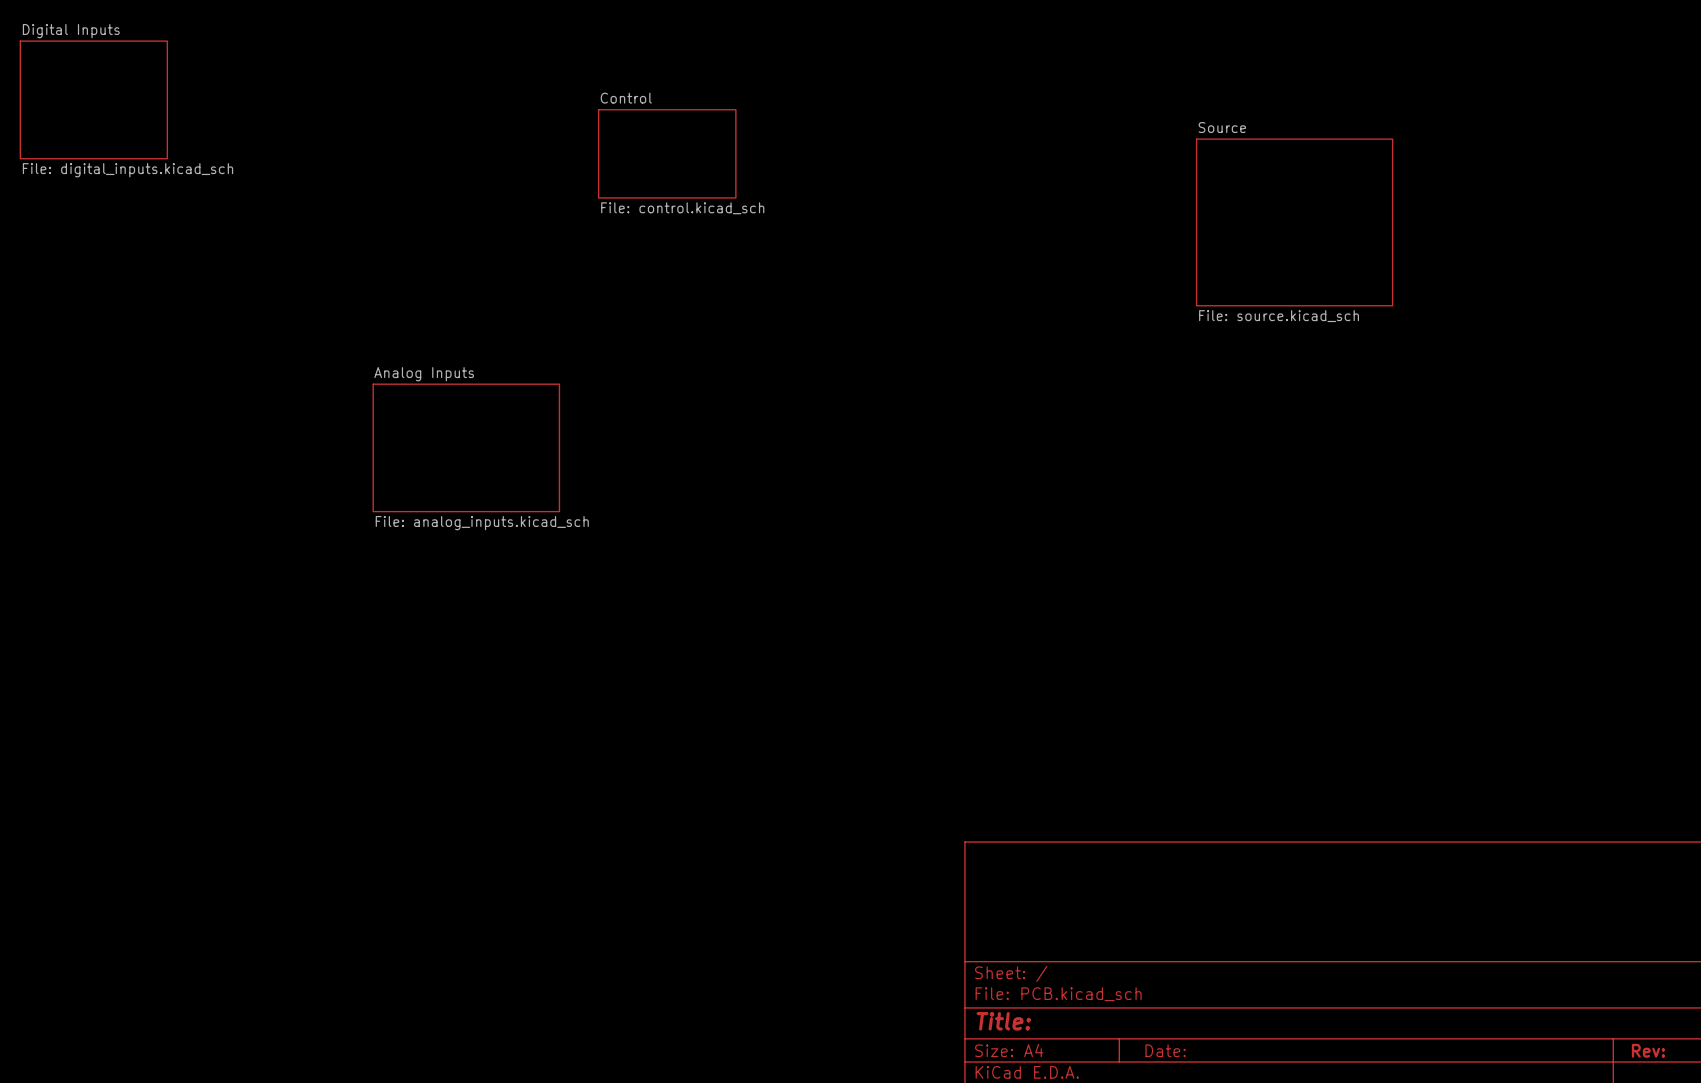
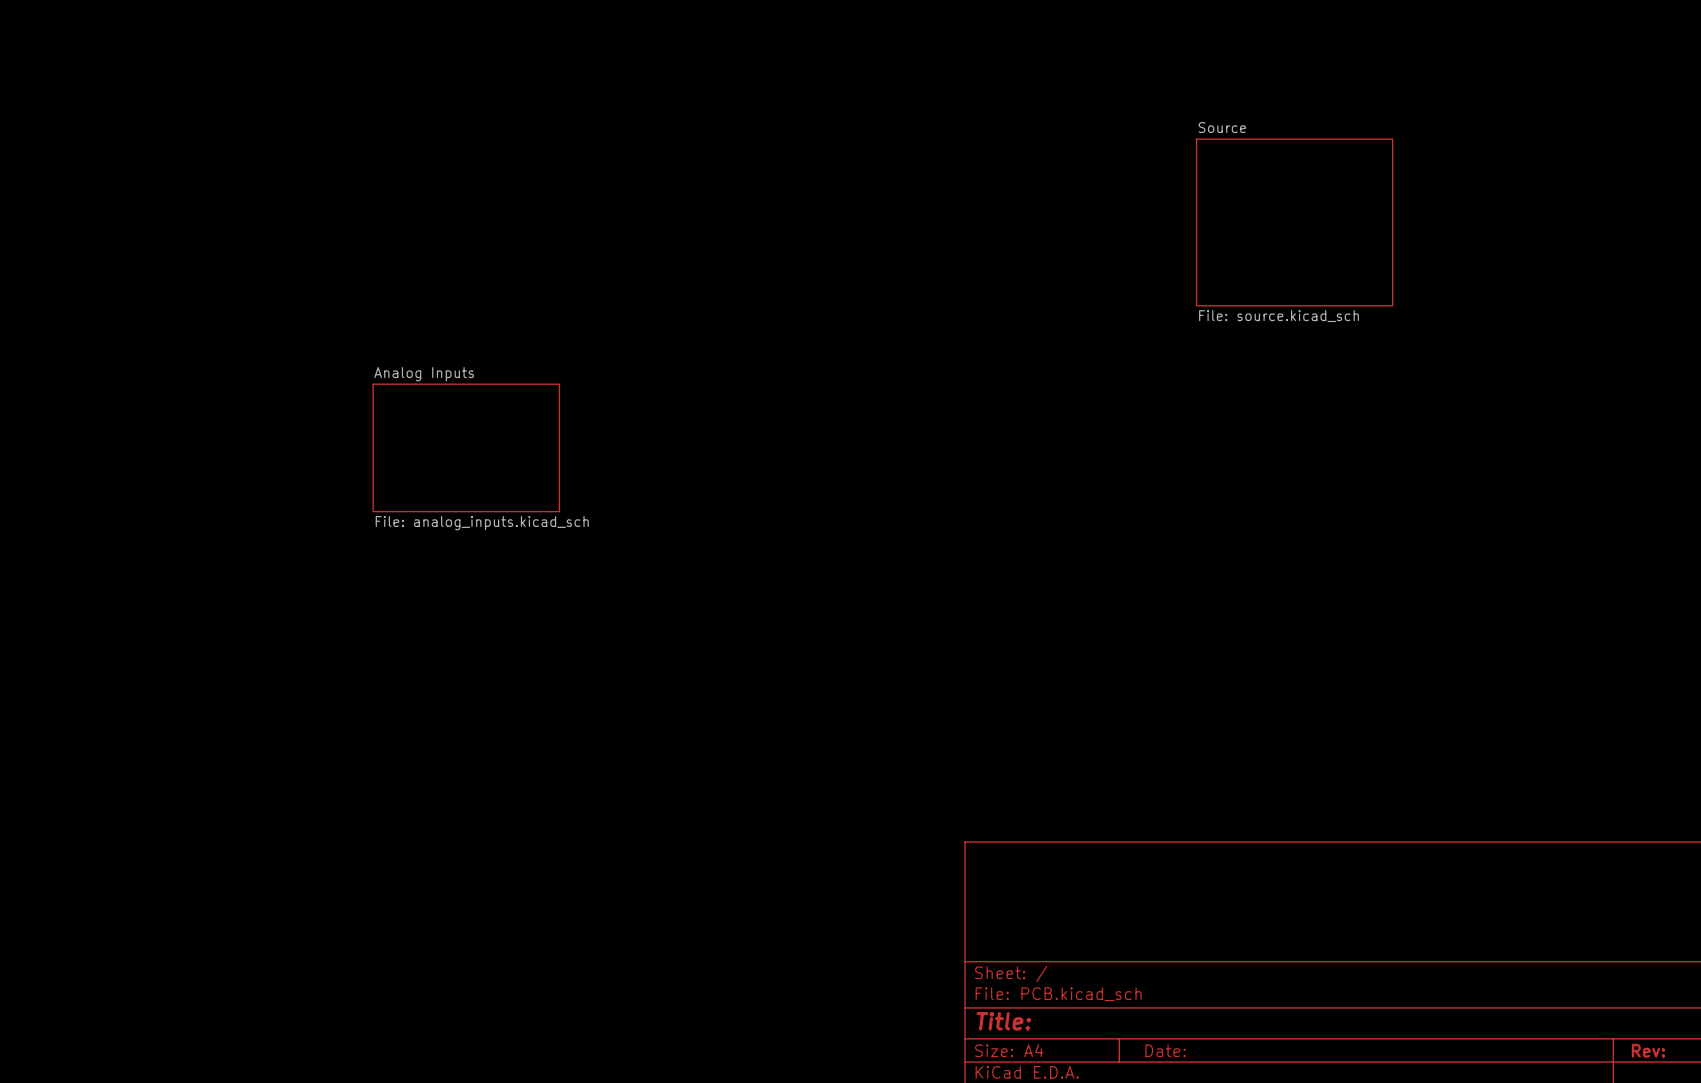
sheet Digital Inputs: File: digital_inputs.kicad_sch (93, 99) -> none
sheet Control: File: control.kicad_sch (667, 153) -> none

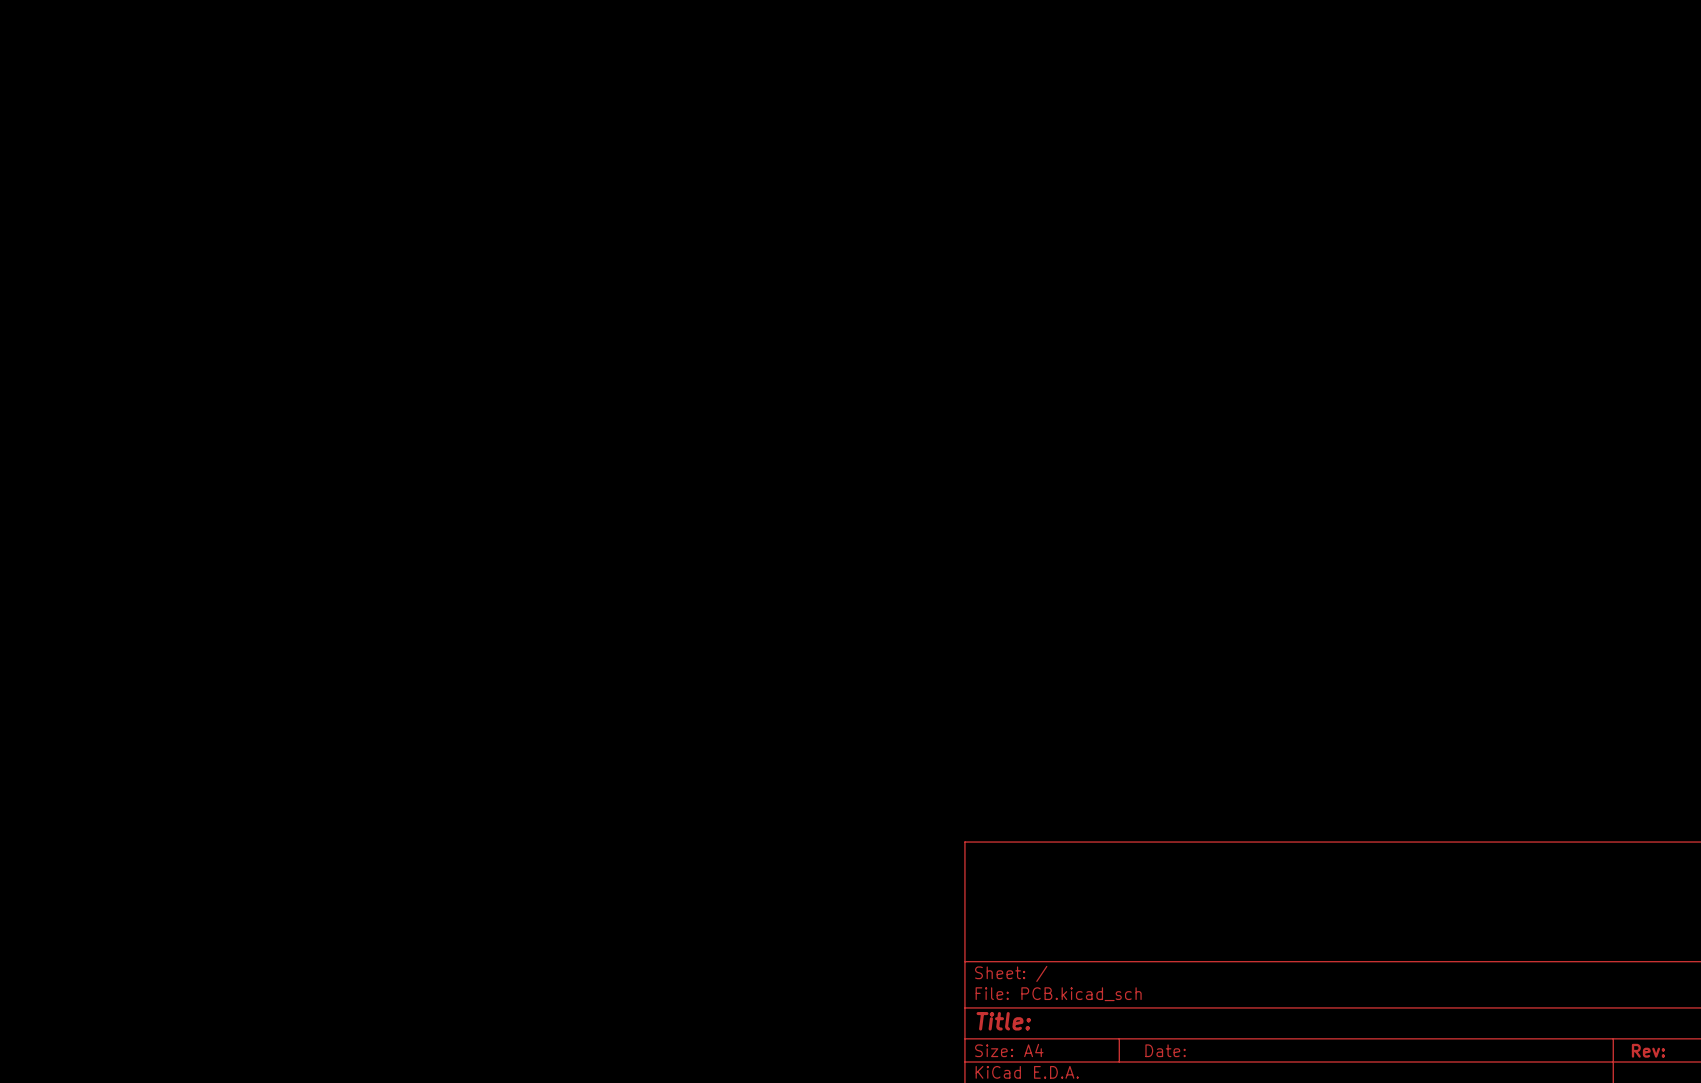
sheet Source: File: source.kicad_sch (1294, 222) -> none
sheet Analog Inputs: File: analog_inputs.kicad_sch (466, 447) -> none

